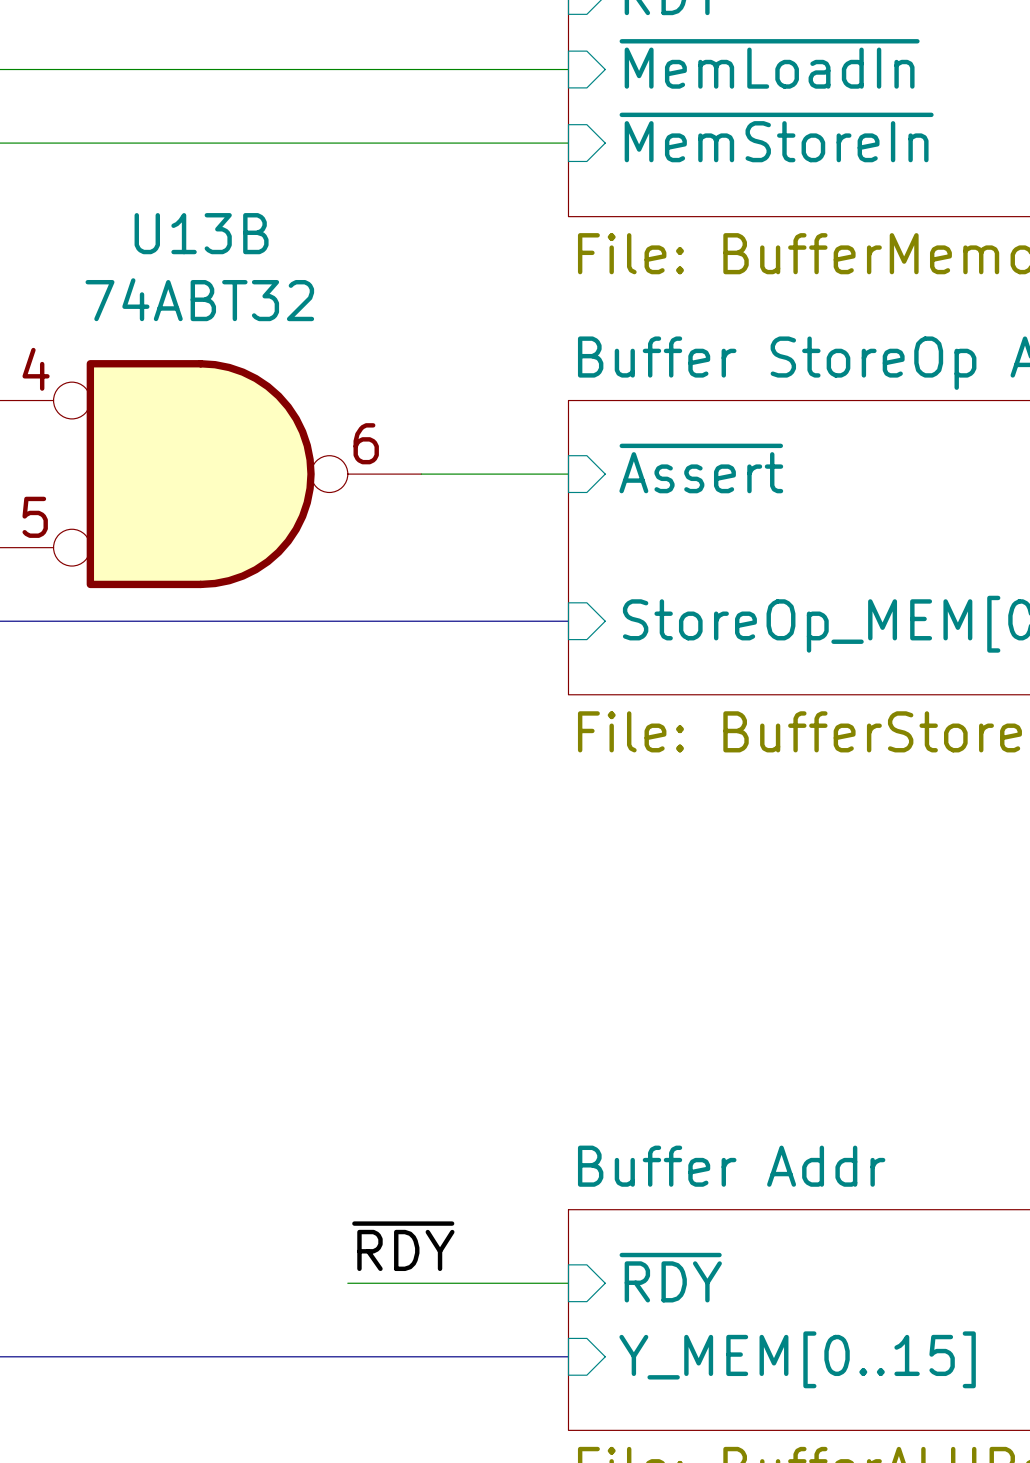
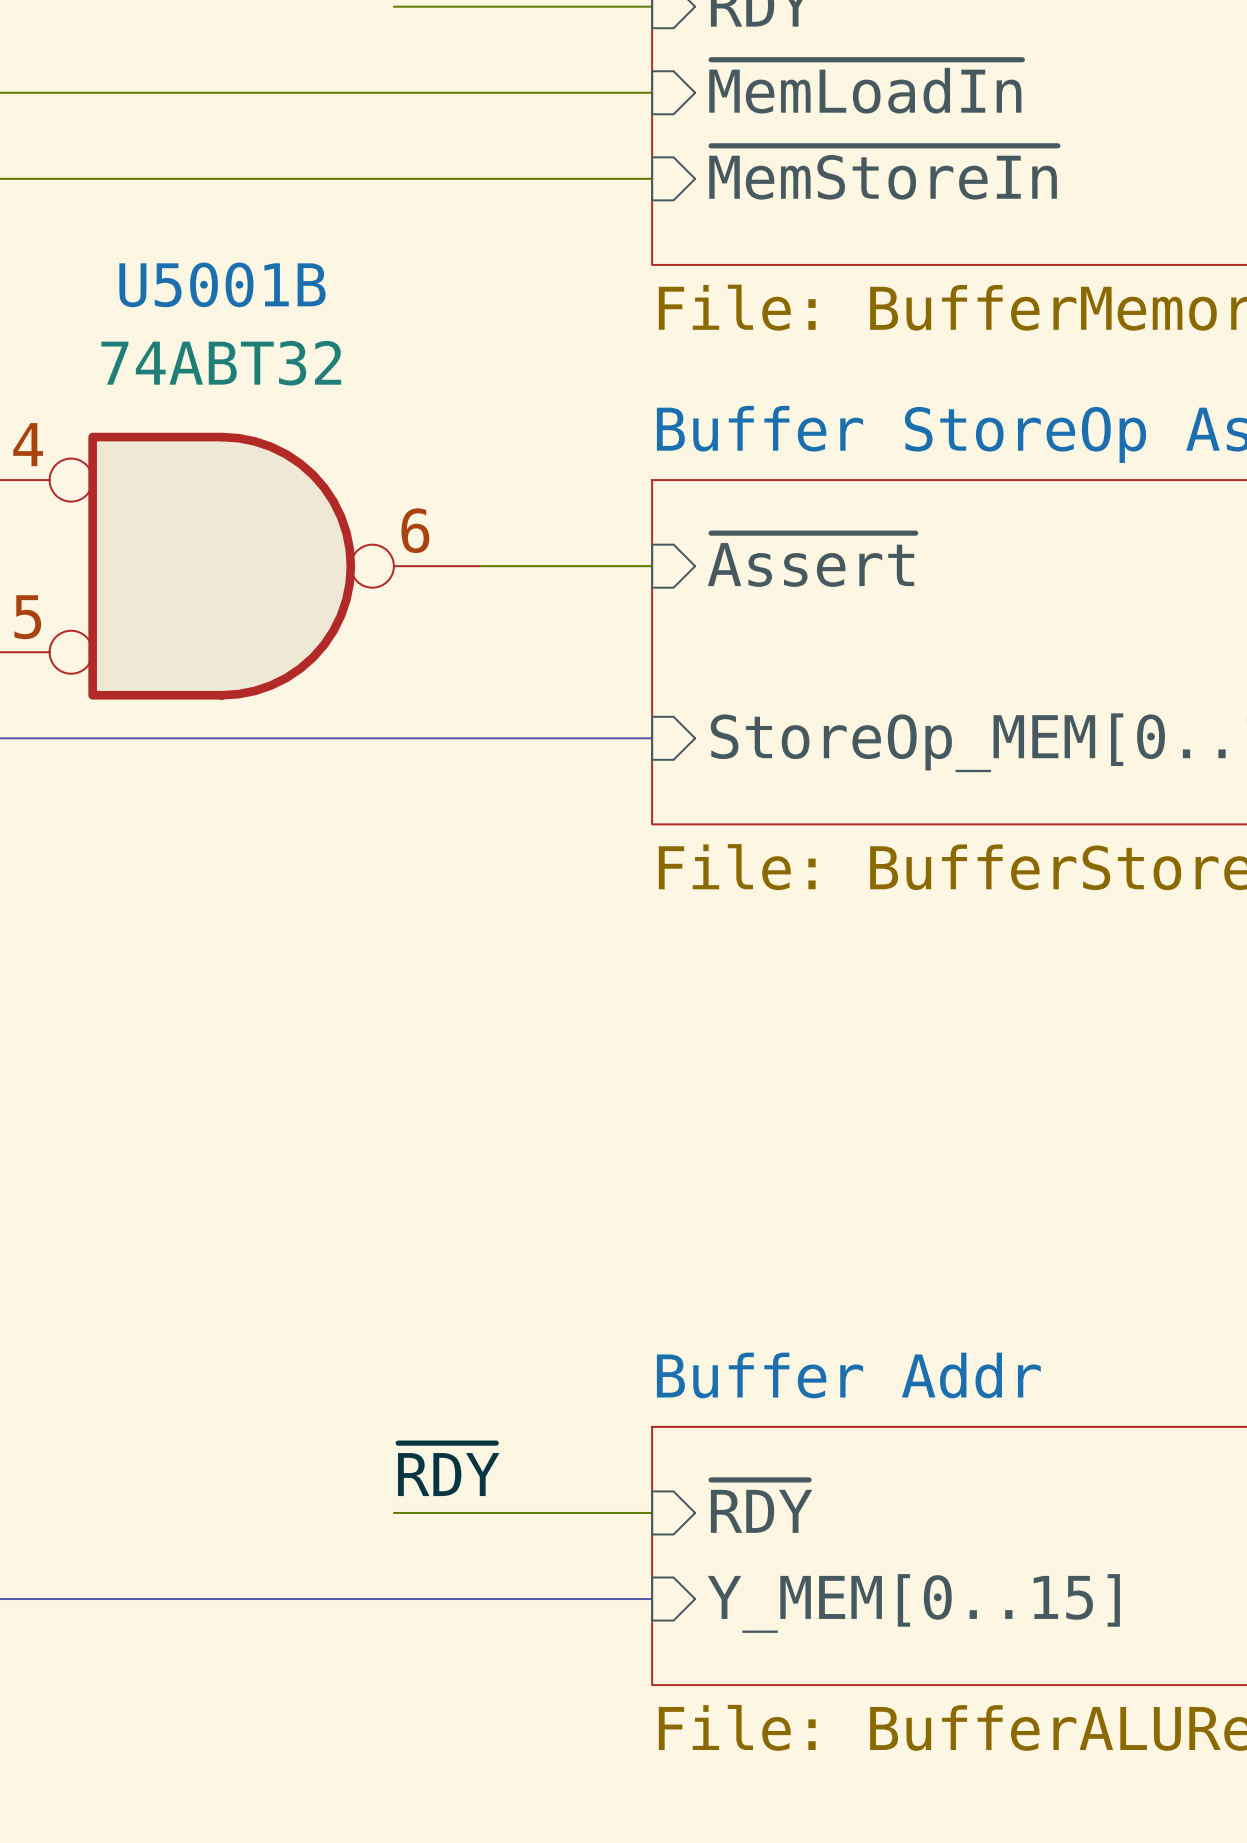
U13B name: U13B (201, 233) -> U5001B (222, 284)

